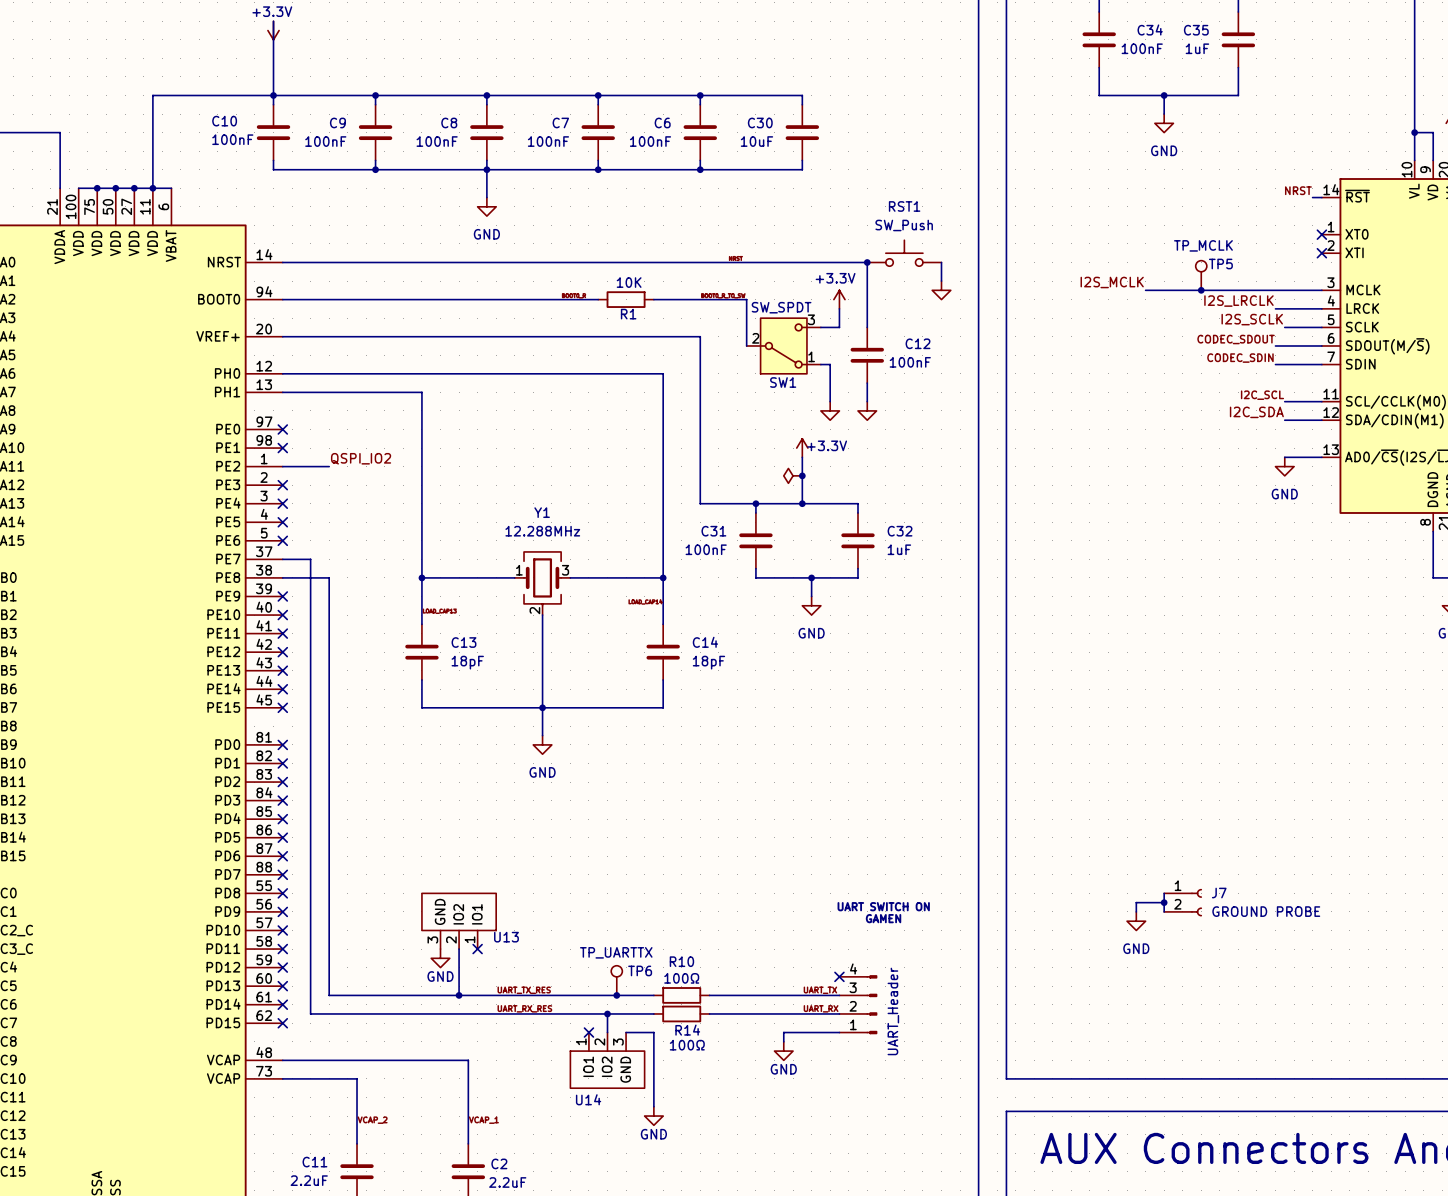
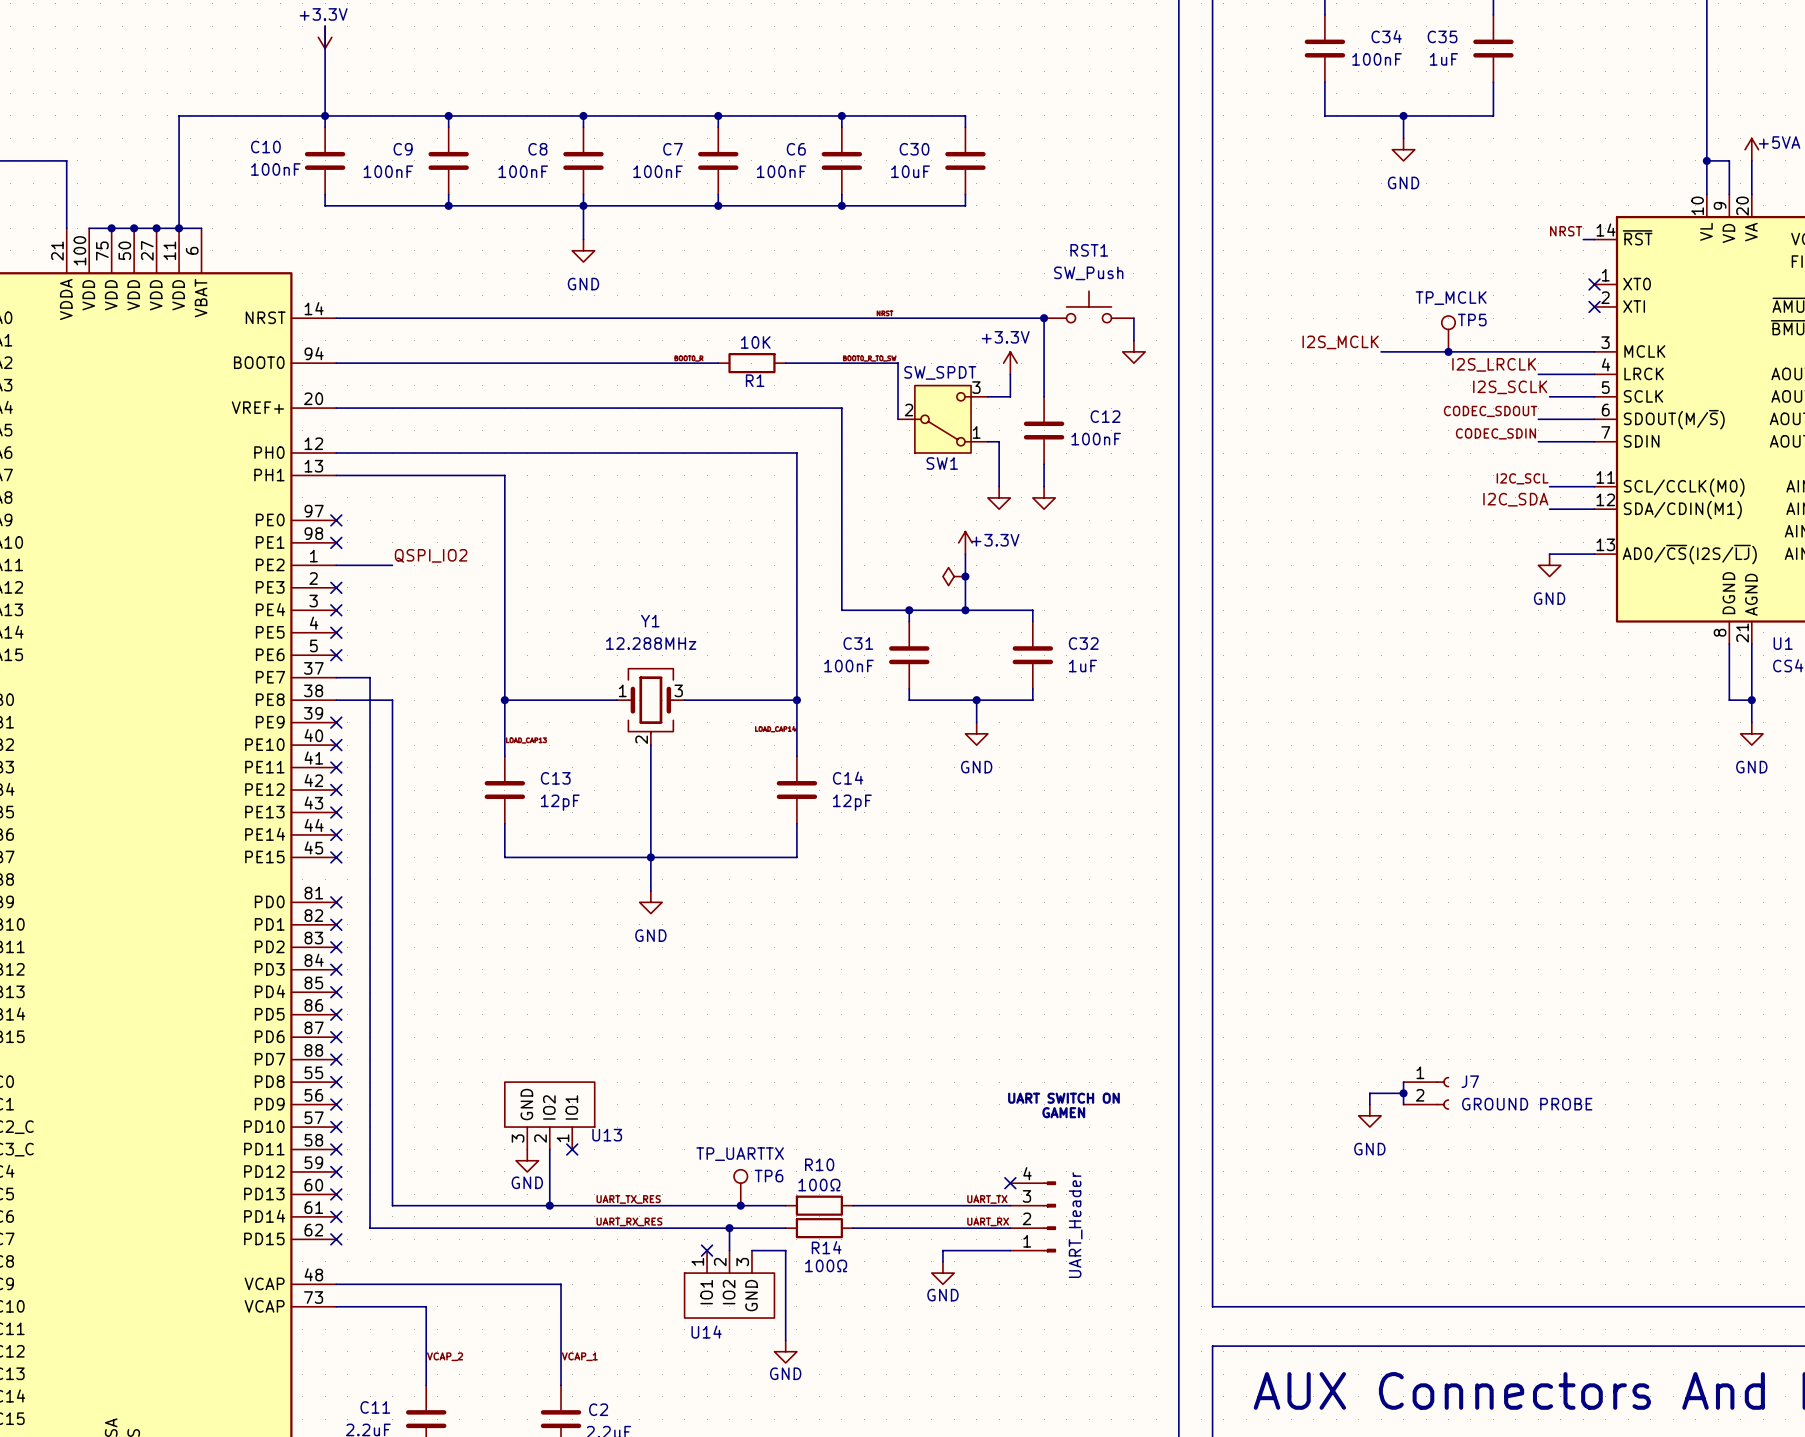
C13 value: 18pF (467, 662) -> 12pF (560, 802)
C14 value: 18pF (708, 662) -> 12pF (852, 802)

